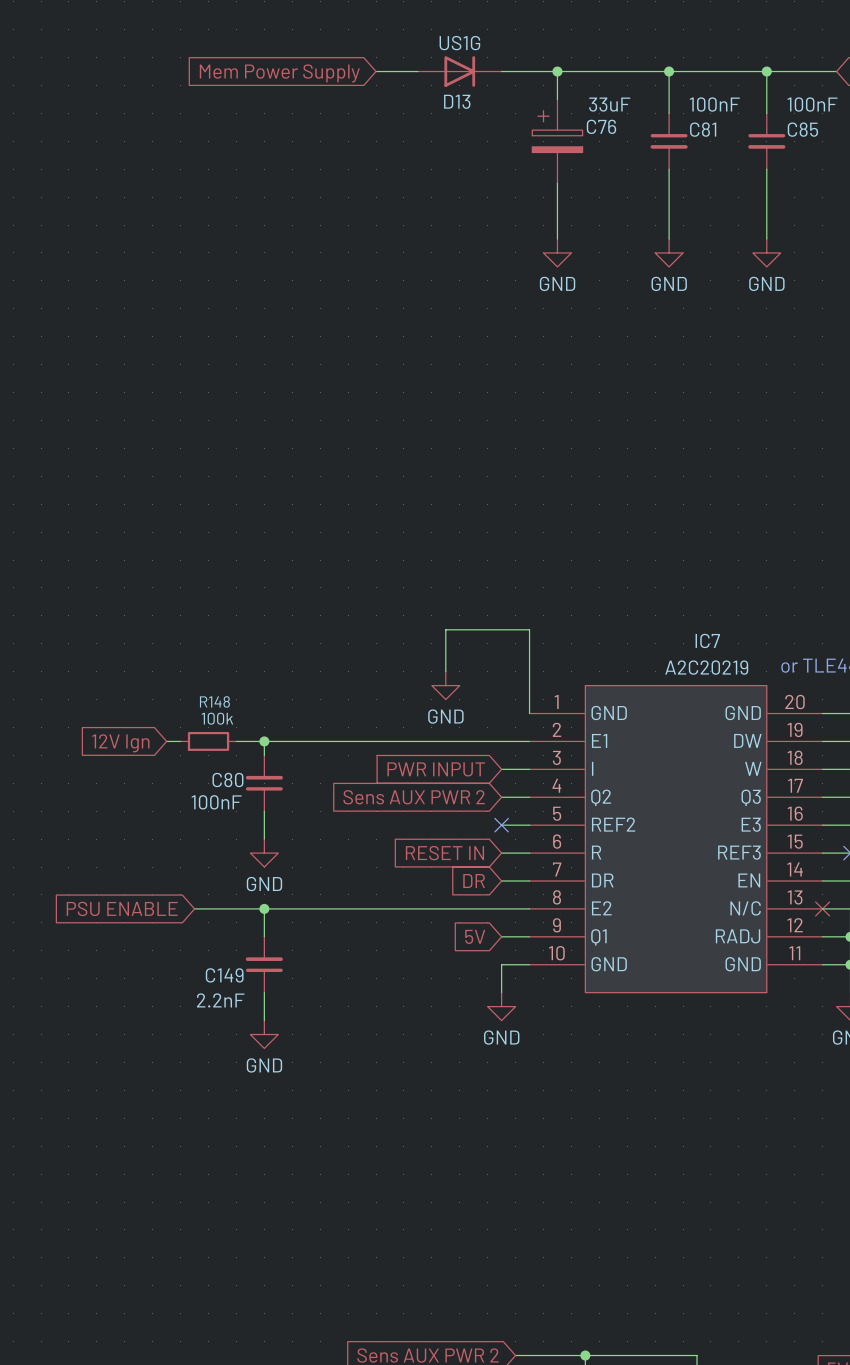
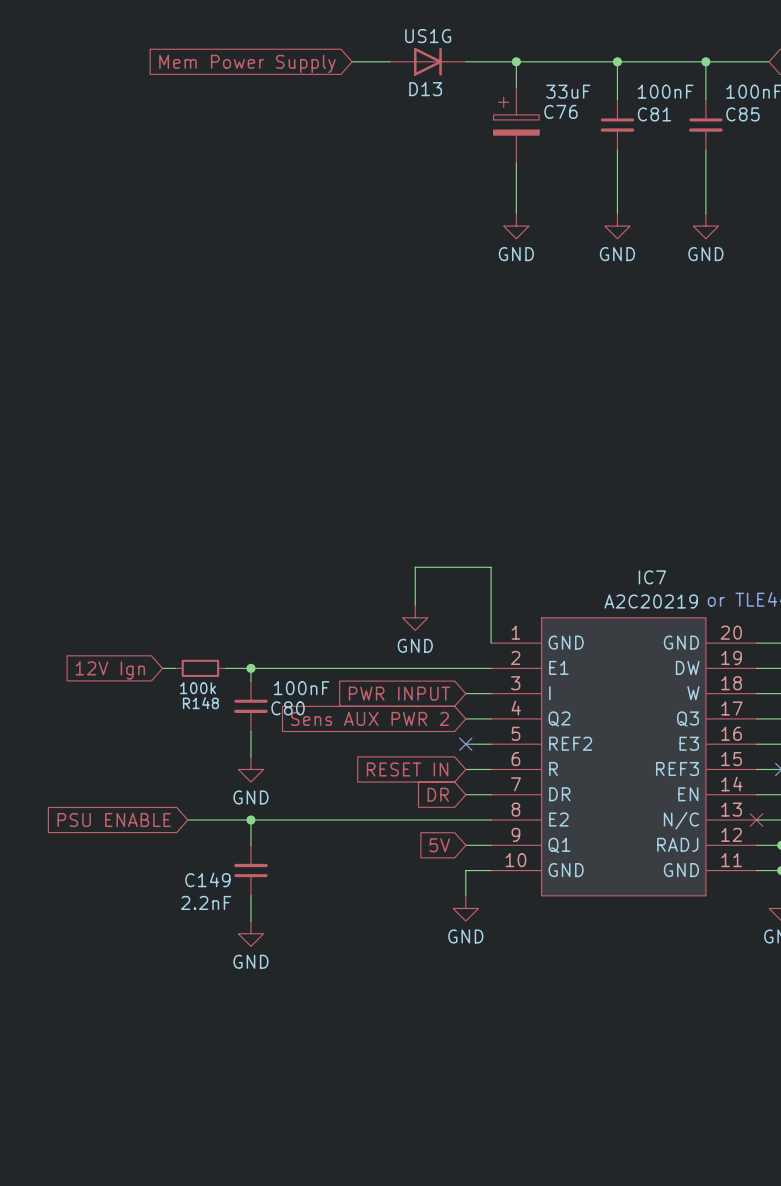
R148 name position: R148 (214, 701) -> R148 (200, 703)
R148 value position: 100k (217, 718) -> 100k (198, 688)
C80 rotation: 0° (264, 783) -> 180° (250, 706)

